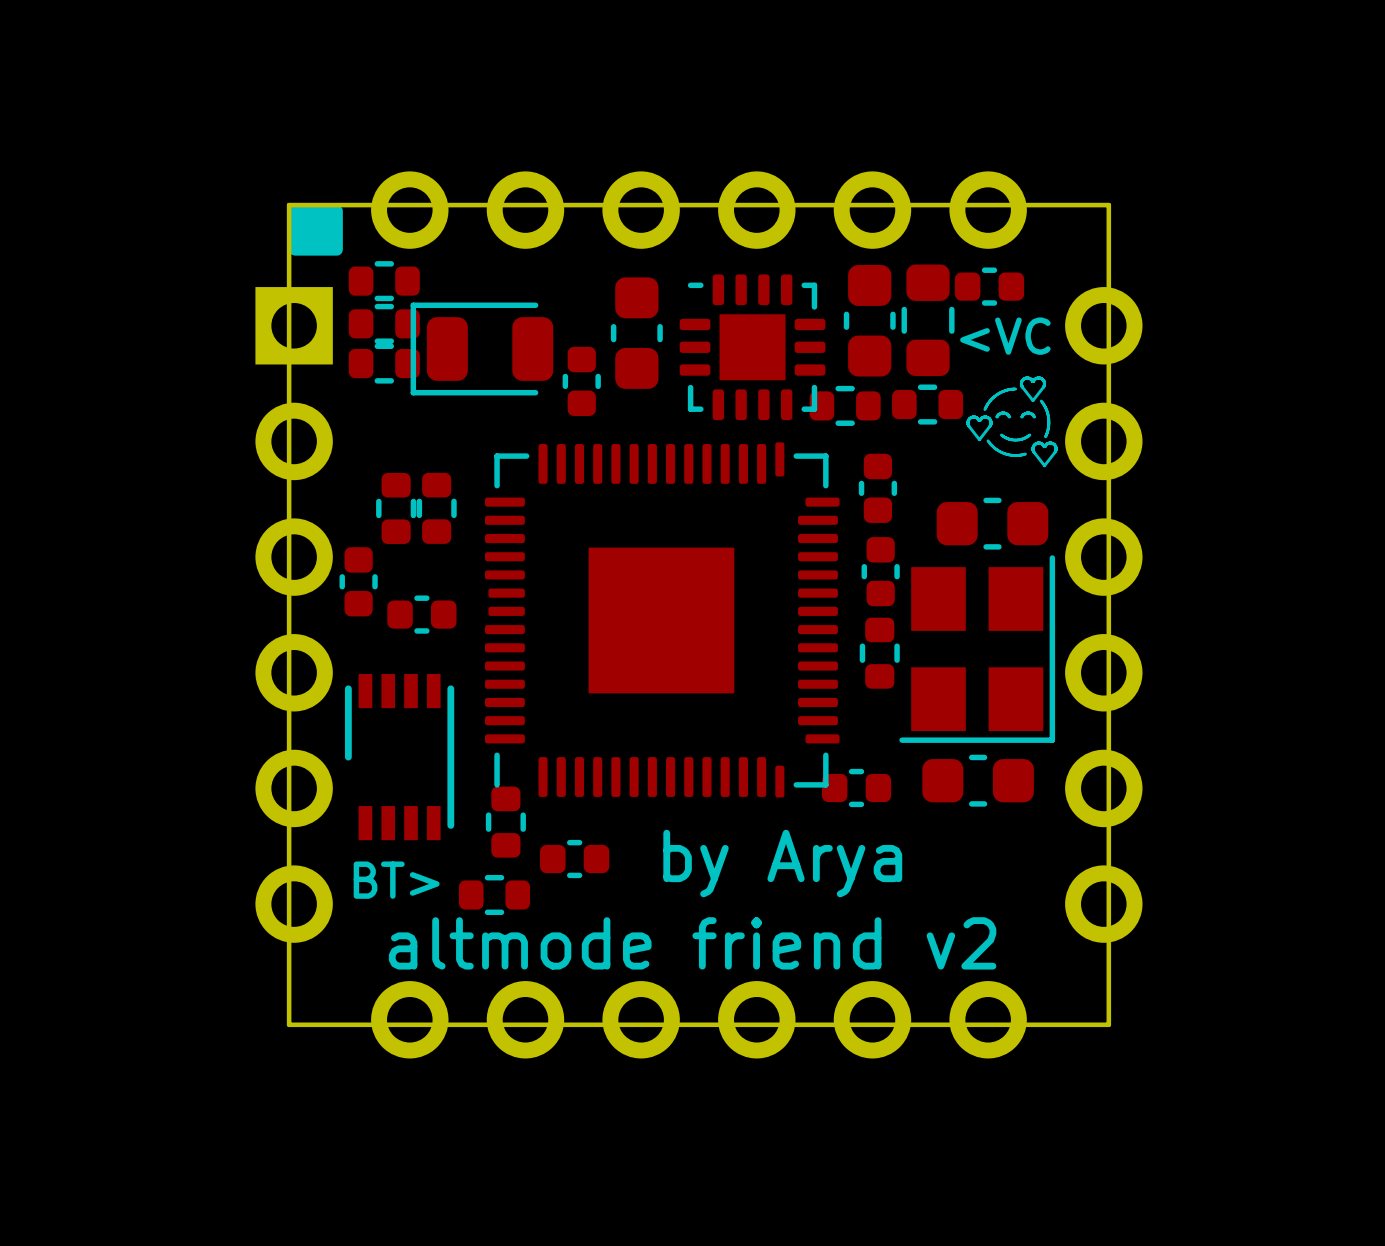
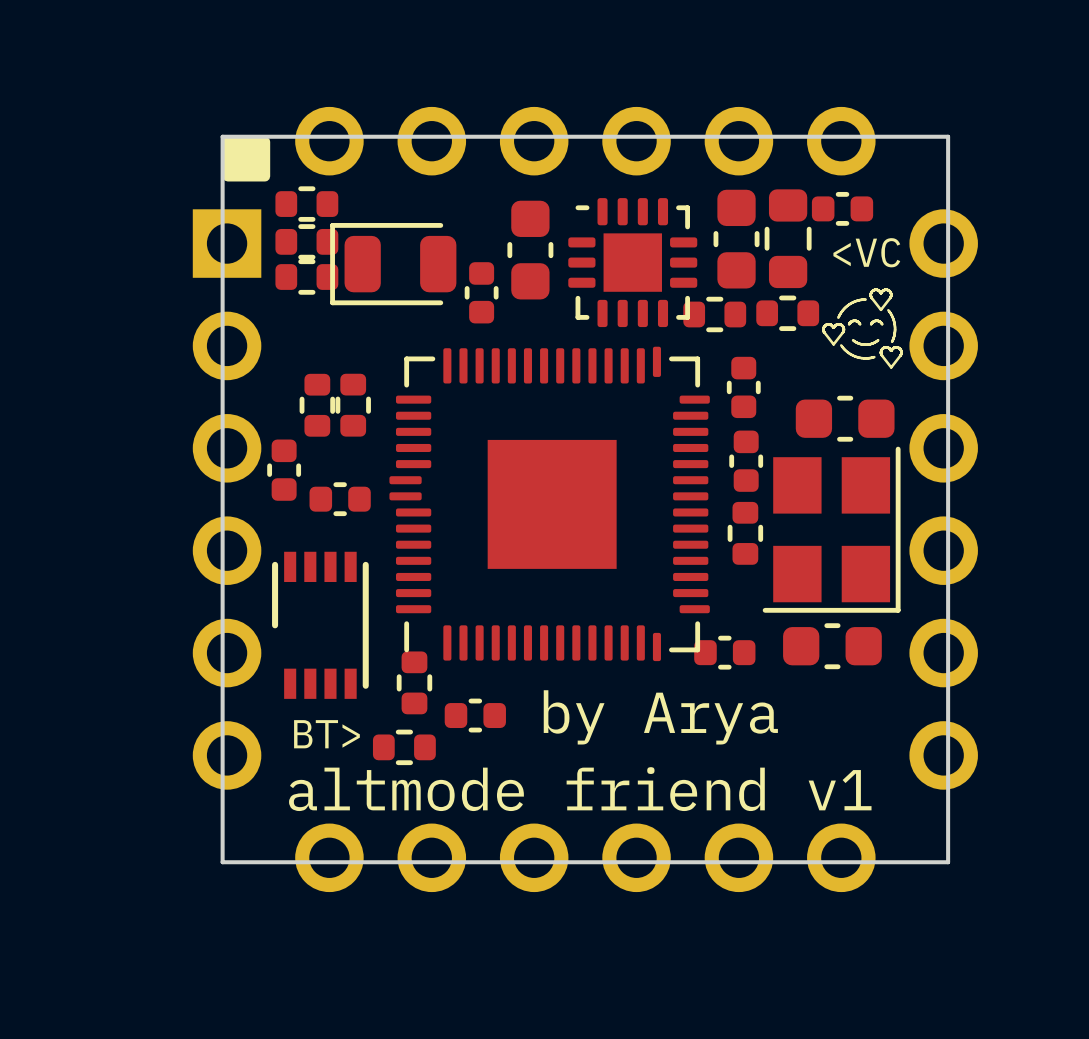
part footprint: [484, 442, 840, 798] -> [389, 346, 710, 662]
text: altmode friend v2 (692, 943) -> altmode friend v1 (580, 789)

